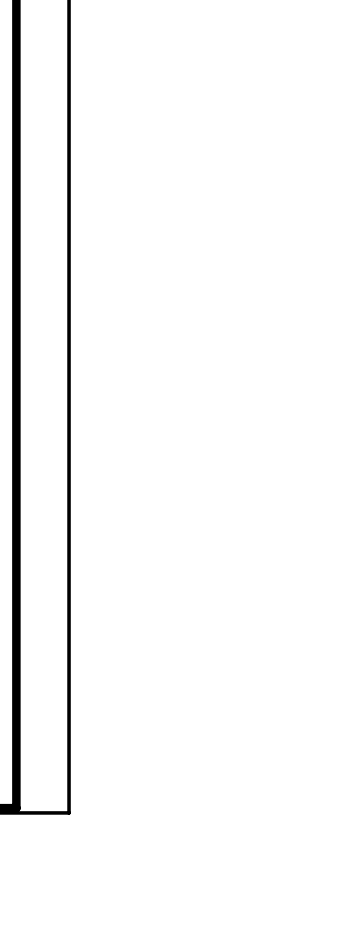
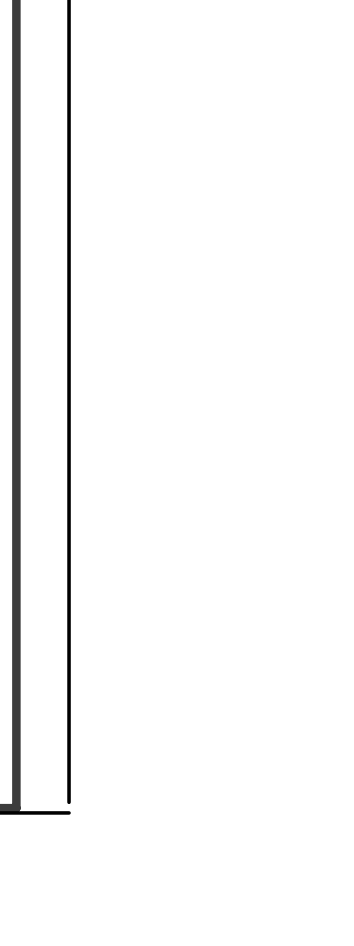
board edge: (69, 802) (69, 812) -> none

